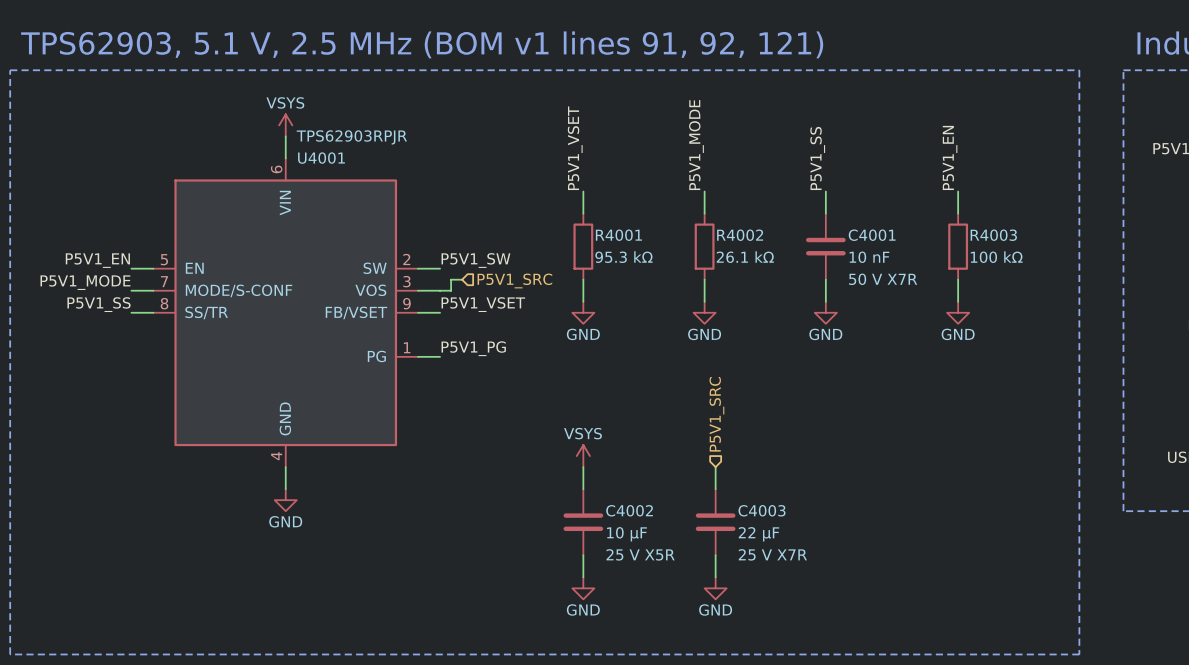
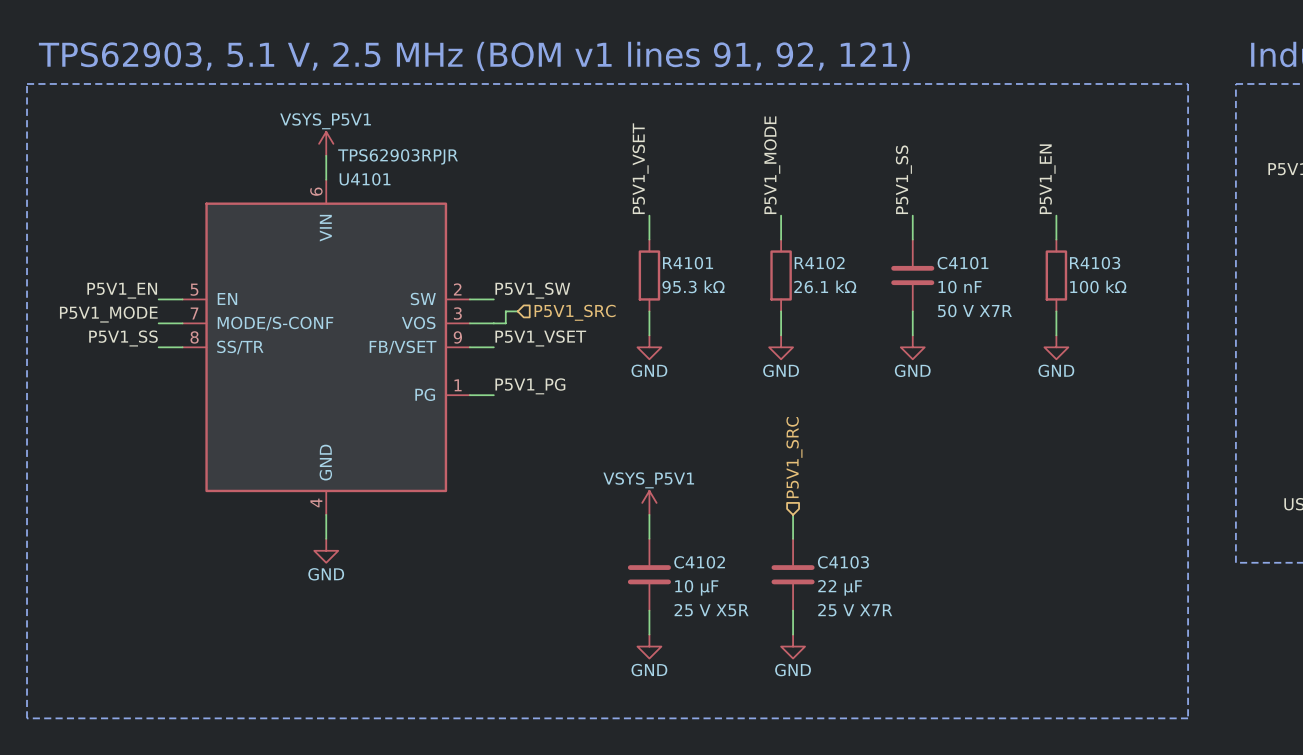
power symbol: VSYS (285, 125) -> VSYS_P5V1 (326, 143)
U4001 name: U4001 (321, 158) -> U4101 (365, 179)
R4001 name: R4001 (618, 235) -> R4101 (688, 263)
R4002 name: R4002 (740, 235) -> R4102 (819, 263)
C4001 name: C4001 (872, 235) -> C4101 (963, 263)
R4003 name: R4003 (993, 235) -> R4103 (1095, 263)
power symbol: VSYS (583, 456) -> VSYS_P5V1 (649, 502)
C4002 name: C4002 (629, 510) -> C4102 (699, 562)
C4003 name: C4003 (762, 510) -> C4103 (843, 562)

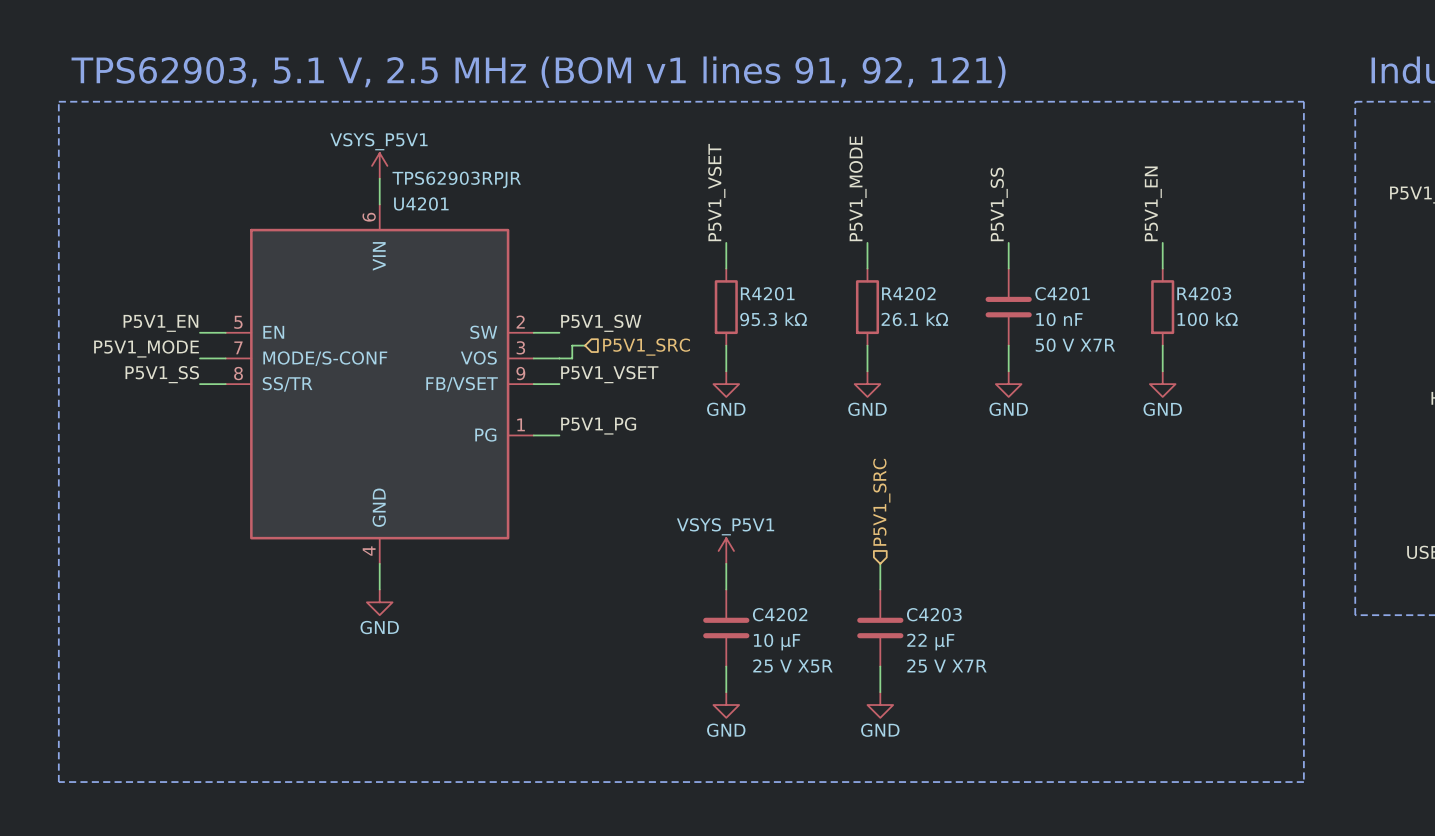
U4101 name: U4101 (365, 179) -> U4201 (421, 203)
R4101 name: R4101 (688, 263) -> R4201 (767, 293)
R4102 name: R4102 (819, 263) -> R4202 (908, 293)
C4101 name: C4101 (963, 263) -> C4201 (1062, 293)
R4103 name: R4103 (1095, 263) -> R4203 (1204, 293)
C4102 name: C4102 (699, 562) -> C4202 (780, 614)
C4103 name: C4103 (843, 562) -> C4203 (934, 614)

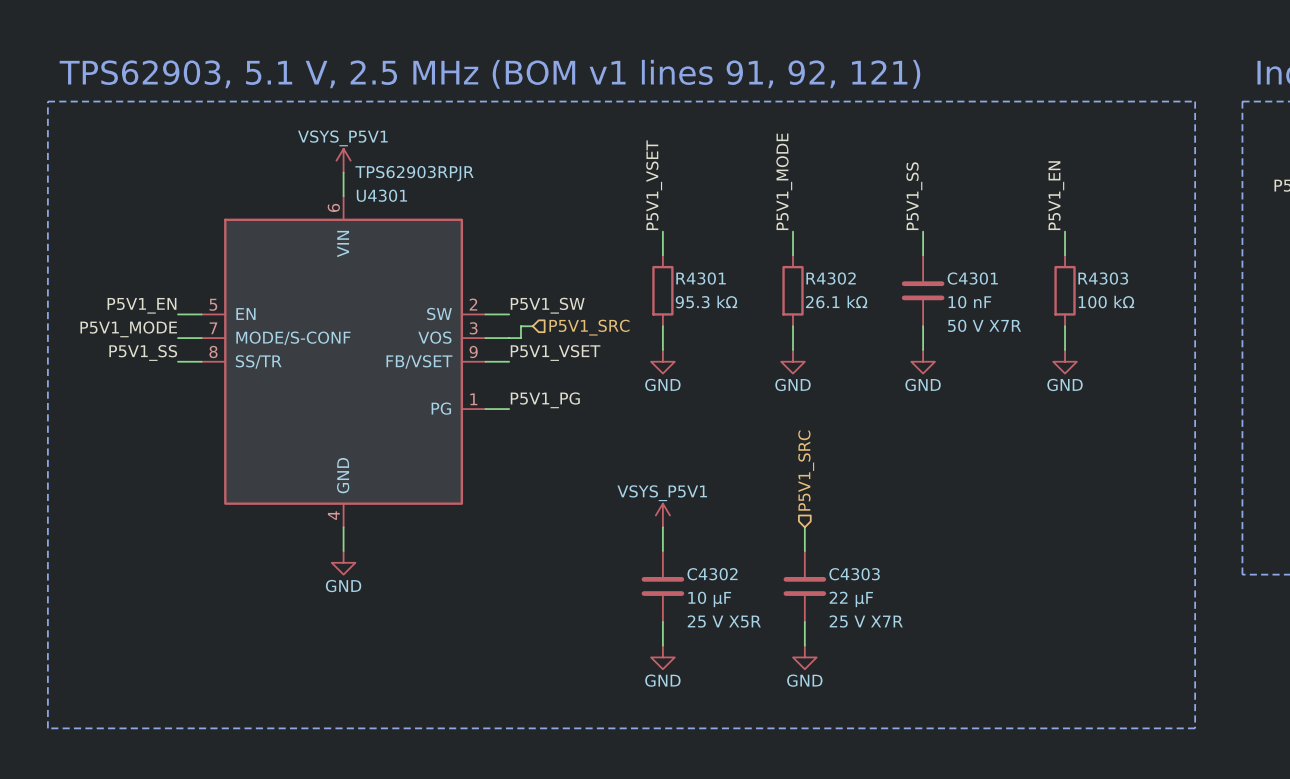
U4201 name: U4201 (421, 203) -> U4301 (381, 195)
R4201 name: R4201 (767, 293) -> R4301 (701, 278)
R4202 name: R4202 (908, 293) -> R4302 (831, 278)
C4201 name: C4201 (1062, 293) -> C4301 (972, 278)
R4203 name: R4203 (1204, 293) -> R4303 (1103, 278)
C4202 name: C4202 (780, 614) -> C4302 (712, 574)
C4203 name: C4203 (934, 614) -> C4303 (854, 574)

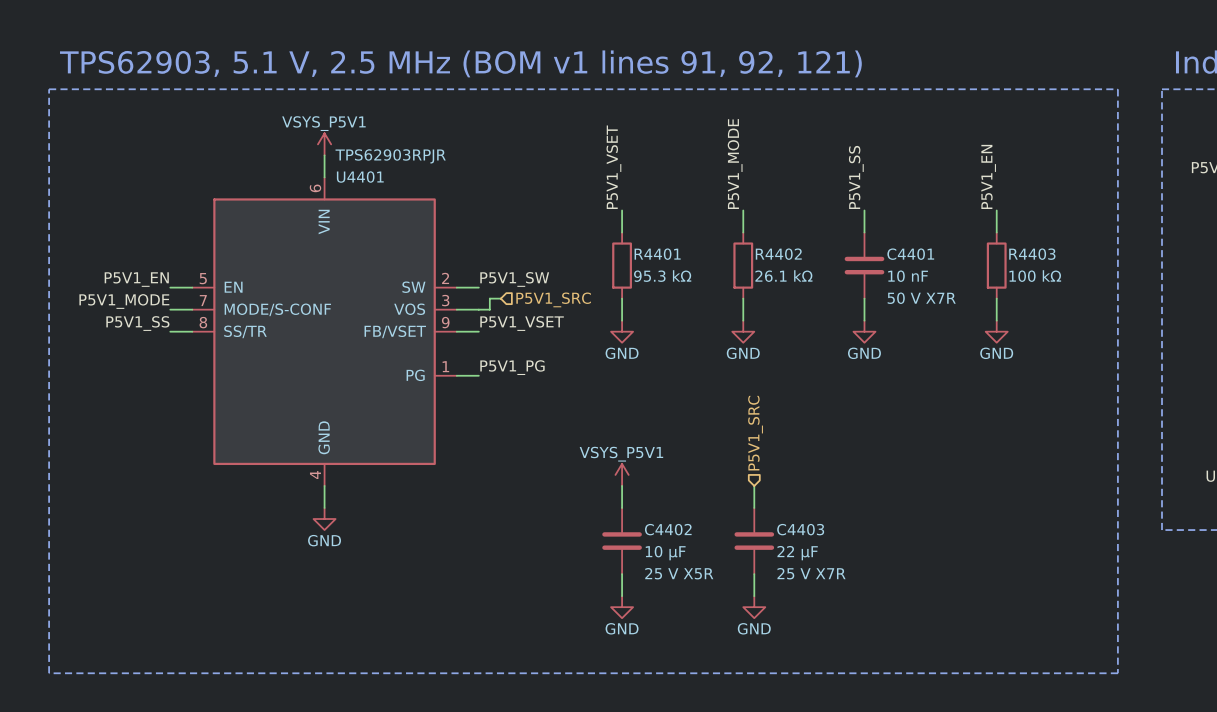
U4301 name: U4301 (381, 195) -> U4401 (360, 177)
R4301 name: R4301 (701, 278) -> R4401 (657, 254)
R4302 name: R4302 (831, 278) -> R4402 (778, 254)
C4301 name: C4301 (972, 278) -> C4401 (910, 254)
R4303 name: R4303 (1103, 278) -> R4403 (1032, 254)
C4302 name: C4302 (712, 574) -> C4402 (668, 529)
C4303 name: C4303 (854, 574) -> C4403 (800, 529)

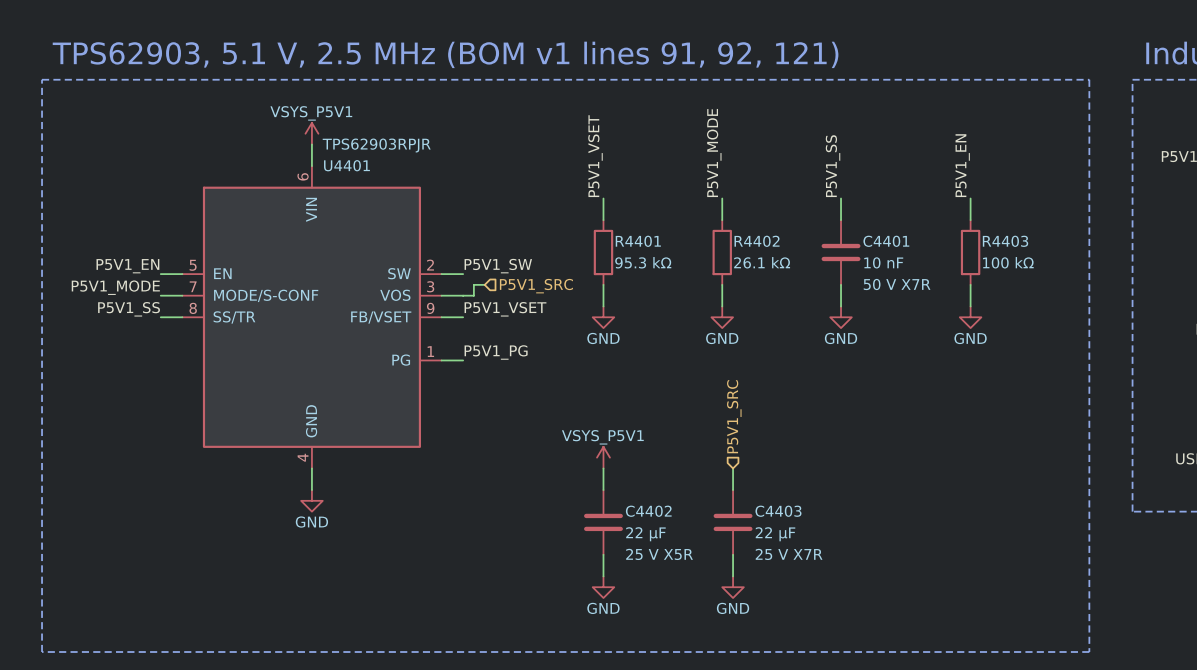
C4402 value: 10 µF (665, 553) -> 22 µF (645, 534)

